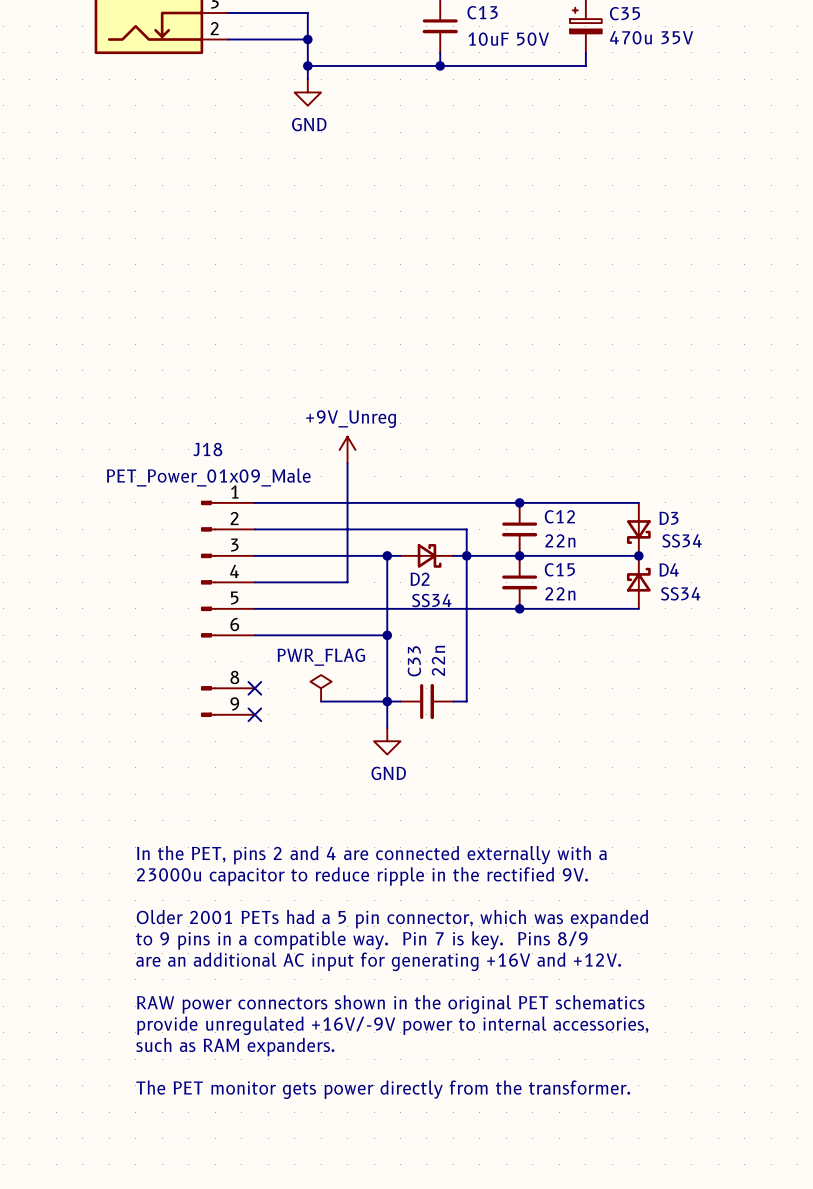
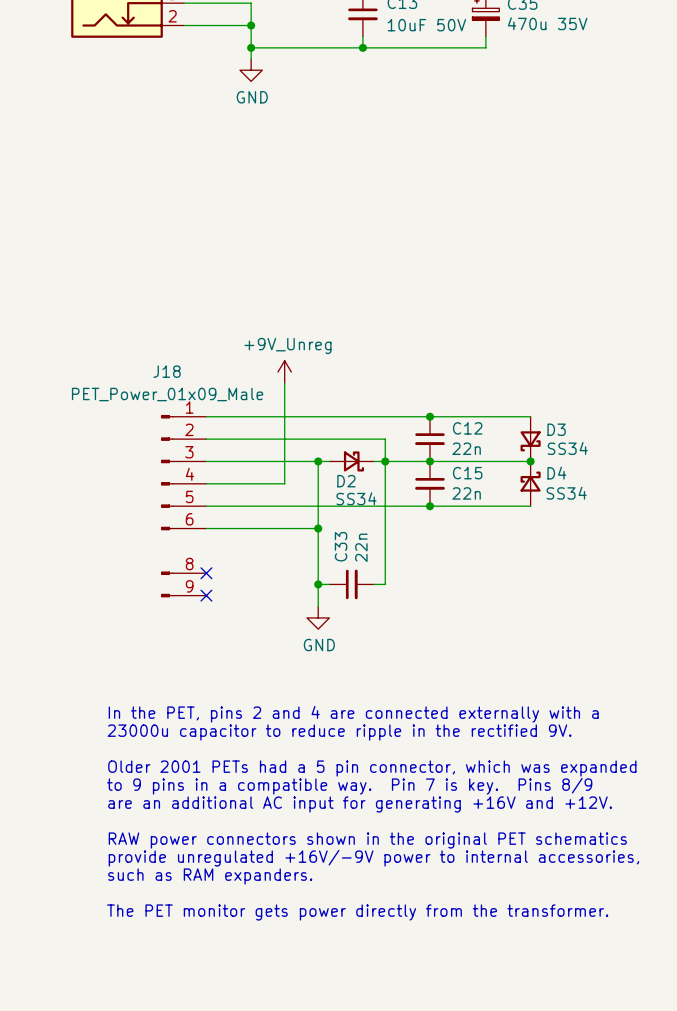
power symbol: PWR_FLAG (321, 688) -> none
wire: (321, 701) (387, 701) -> none

